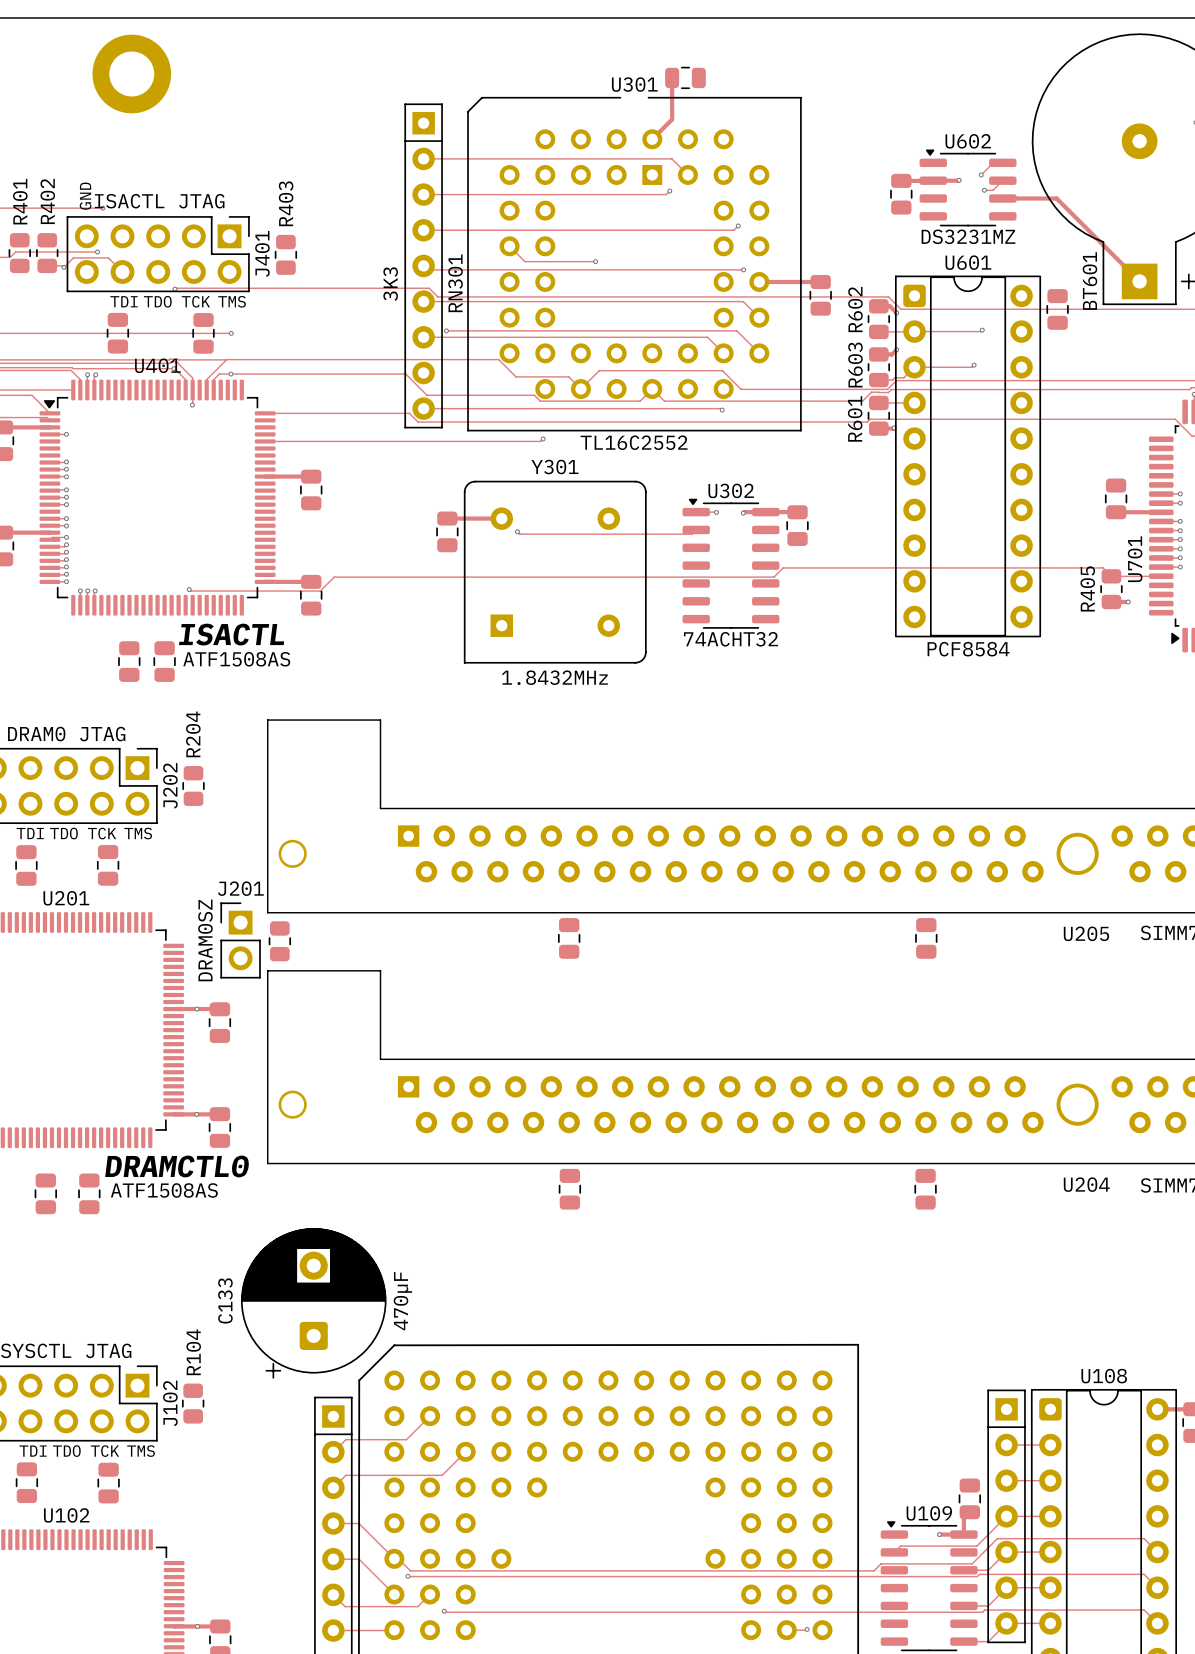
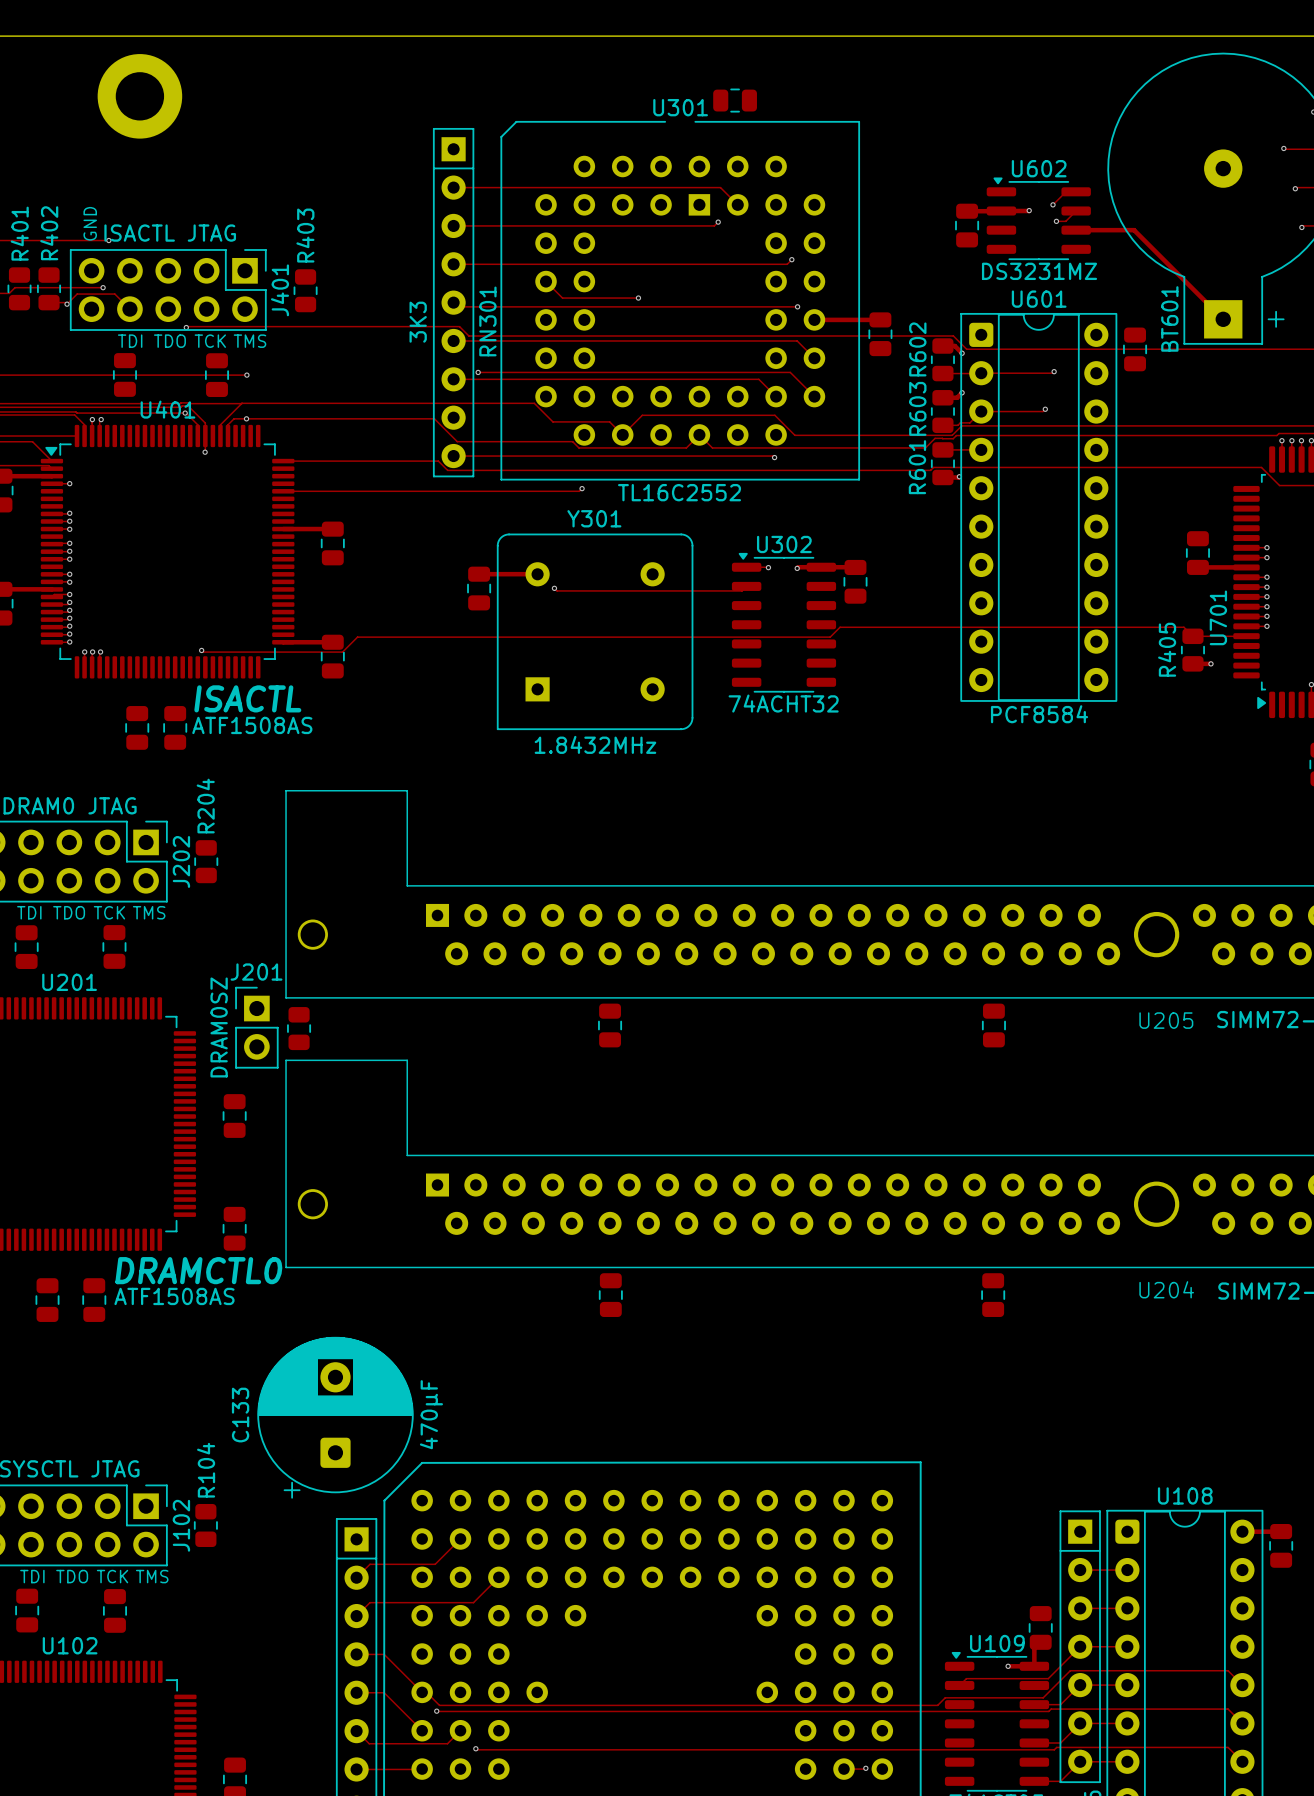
track: (672, 77) (672, 119) (652, 139) -> none
track: (173, 1009) (219, 1009) -> none
via: (197, 1009) -> none
via: (196, 1114) -> none
track: (219, 1114) (173, 1114) -> none
track: (174, 1626) (220, 1626) -> none
via: (197, 1626) -> none

